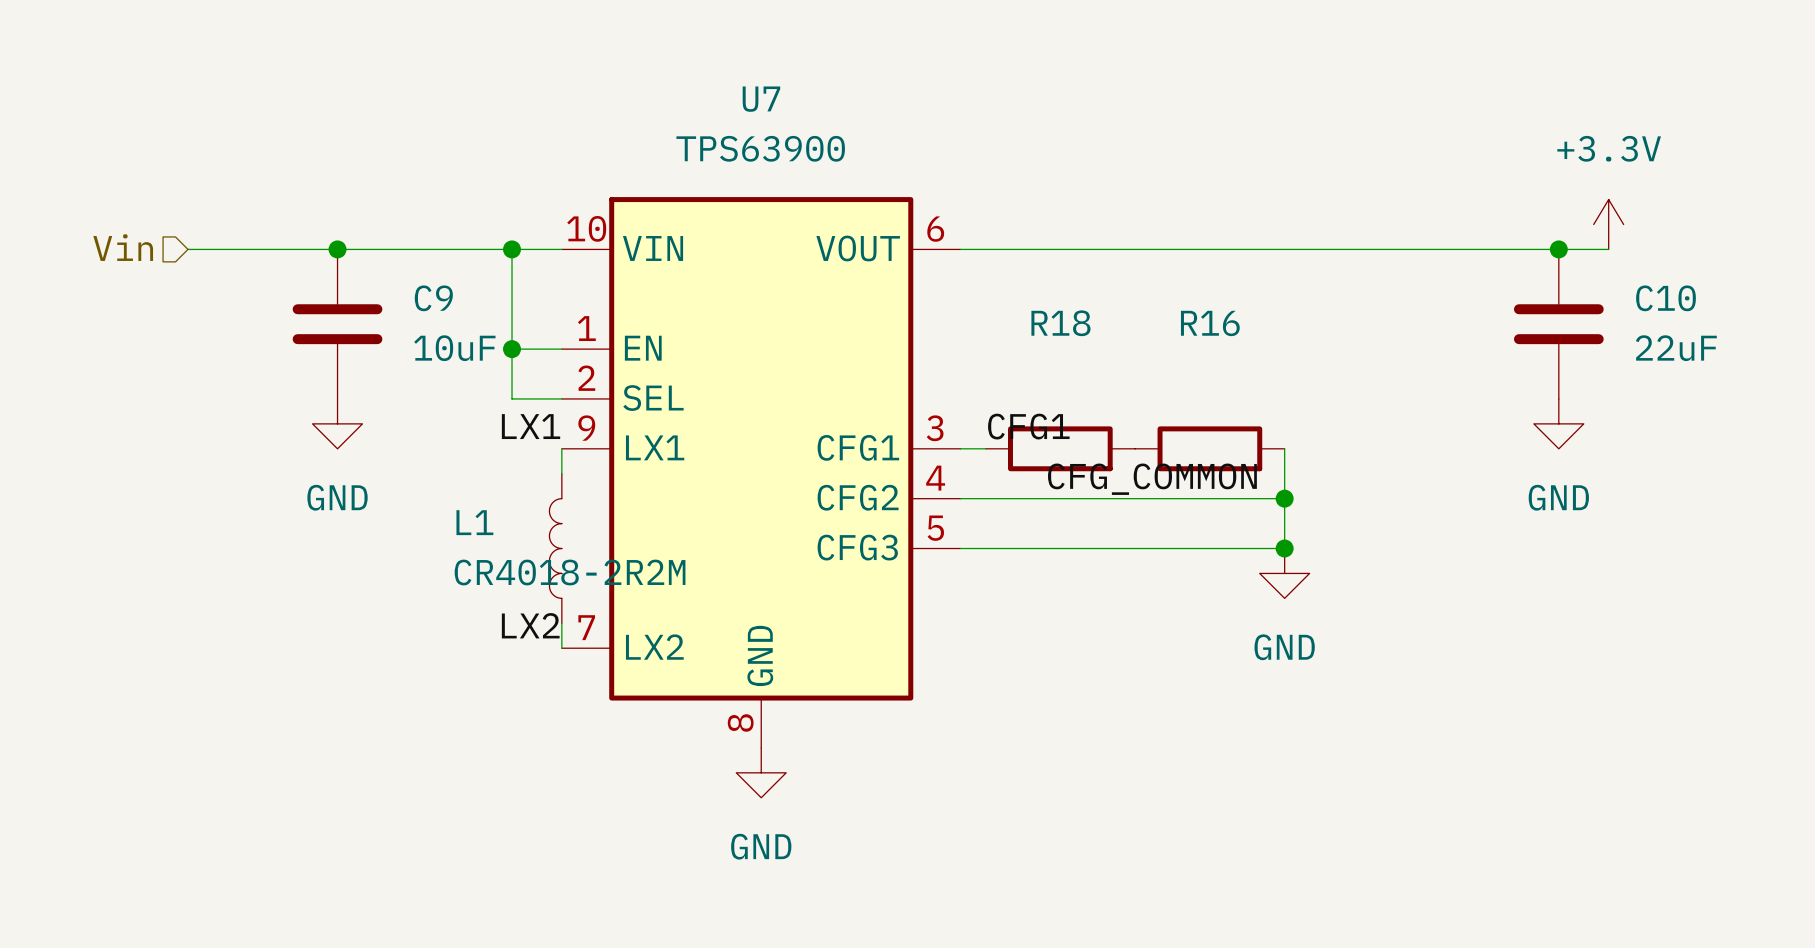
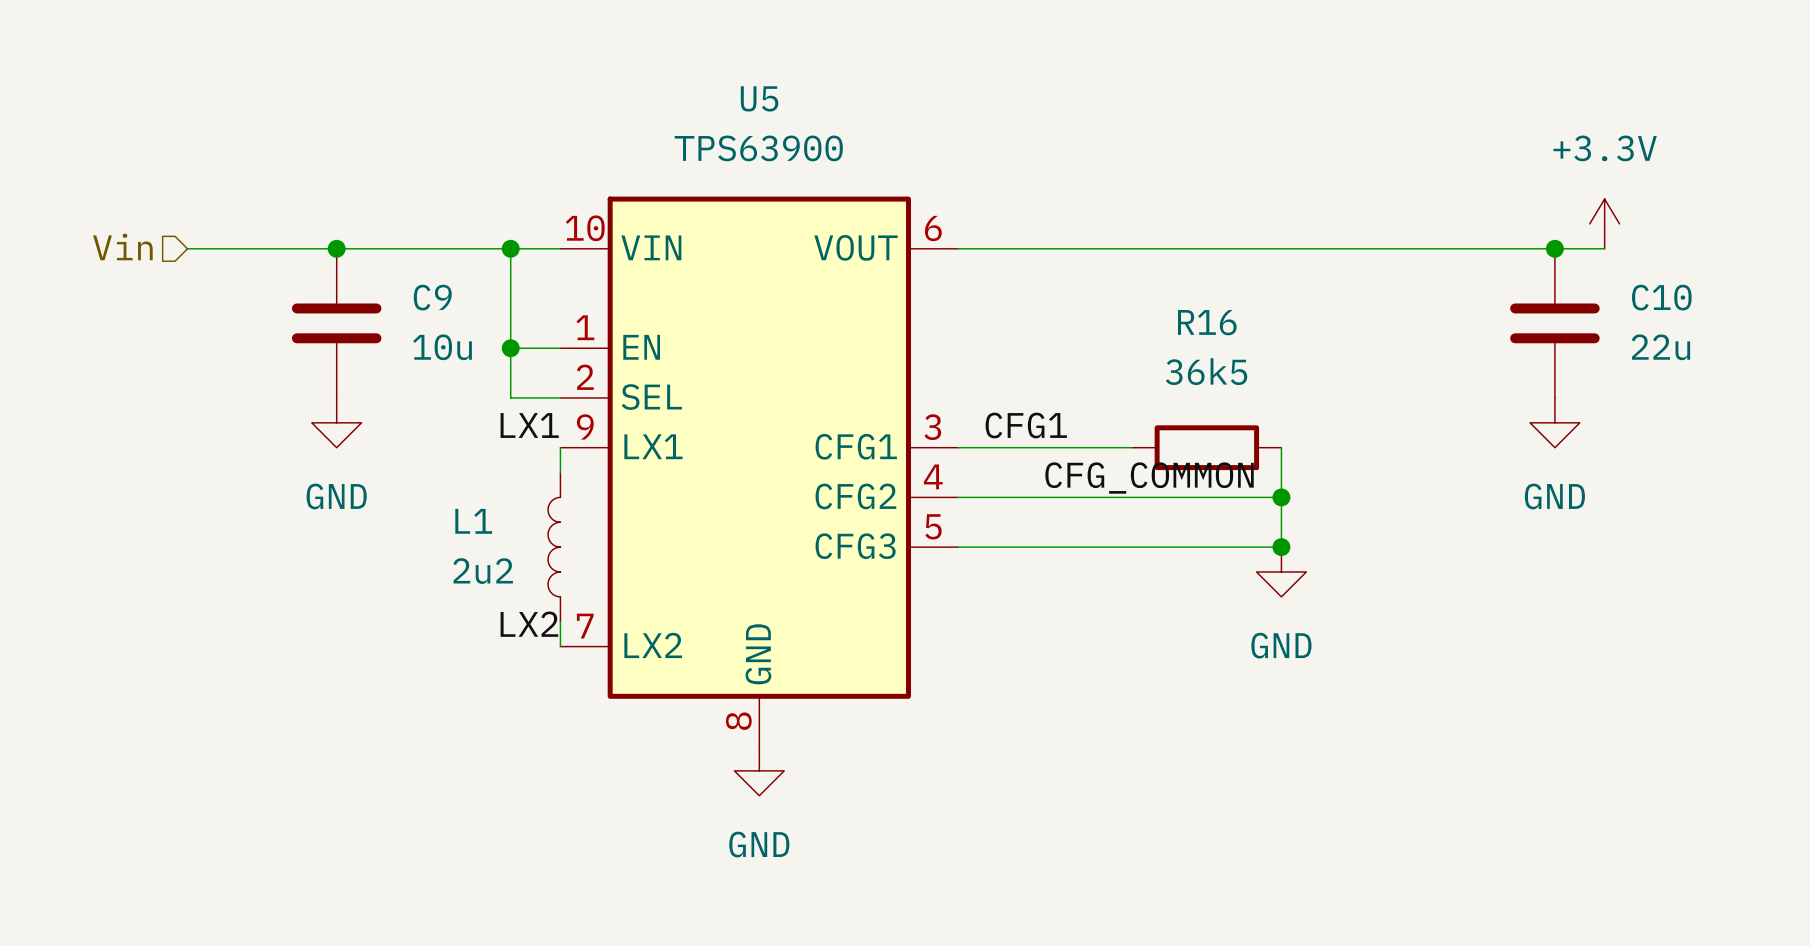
U7 name: U7 (761, 99) -> U5 (759, 98)
C9 value: 10uF (454, 348) -> 10u (442, 347)
C10 value: 22uF (1676, 348) -> 22u (1660, 347)
R16 value: none -> 36k5 (1206, 371)
wire: none -> (983, 447) (1132, 447)
R18: (1060, 448) -> none
L1 value: CR4018-2R2M (570, 572) -> 2u2 (483, 571)

